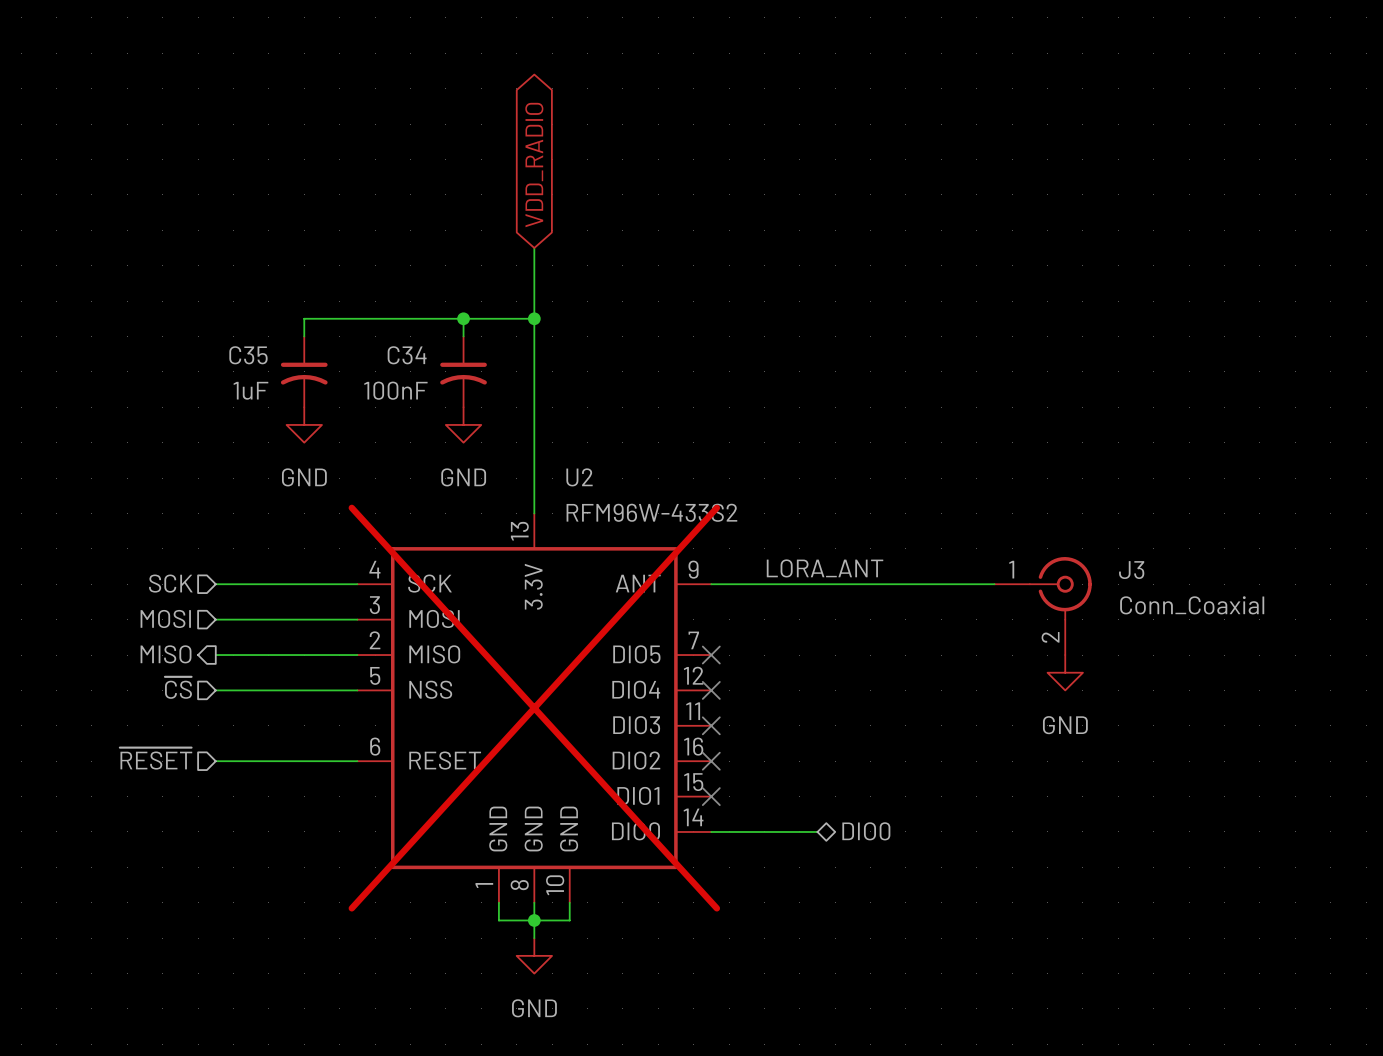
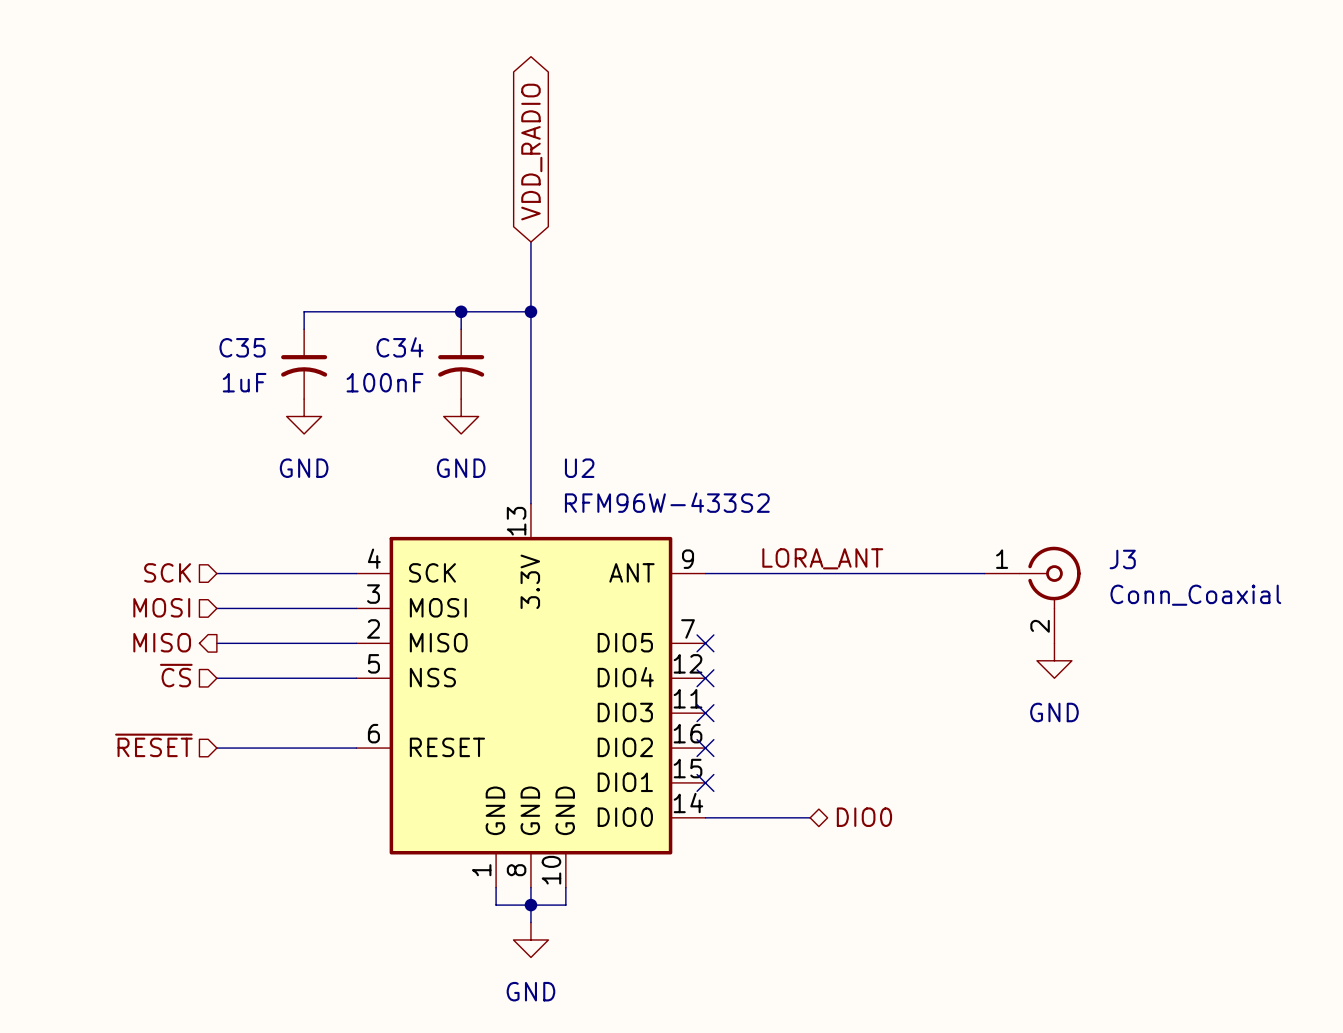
U2 do-not-place cross: (534, 708) -> none

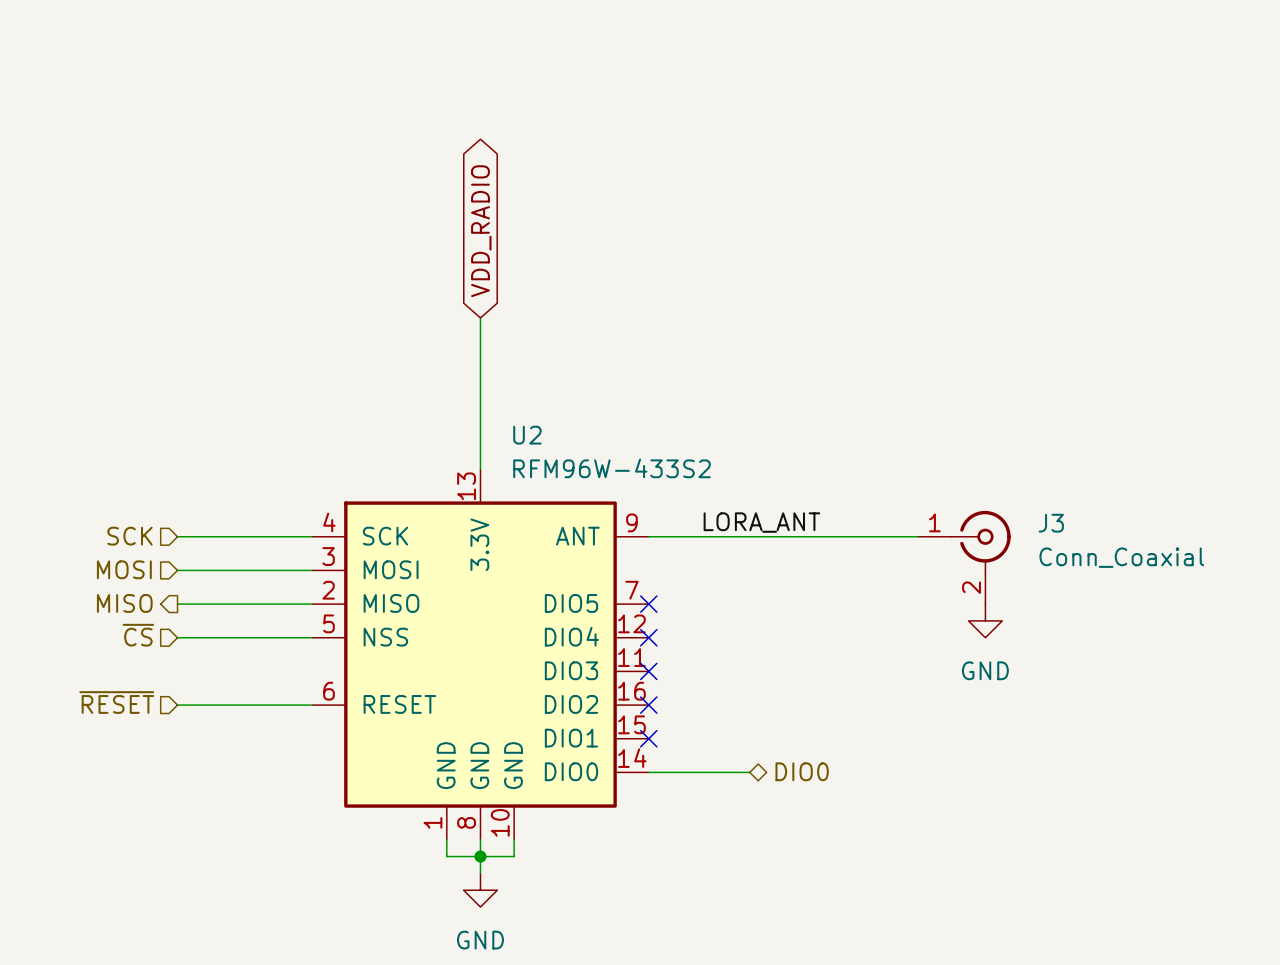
global label position: VDD_RADIO (531, 152) -> VDD_RADIO (481, 231)
wire: (530, 242) (530, 346) -> none
wire: (461, 311) (461, 329) -> none
junction: (461, 311) -> none
wire: (530, 311) (304, 311) (304, 329) -> none
junction: (530, 311) -> none
C35: 1uF (304, 364) -> none
C34: 100nF (461, 364) -> none
power symbol: GND (304, 416) -> none
power symbol: GND (461, 416) -> none

